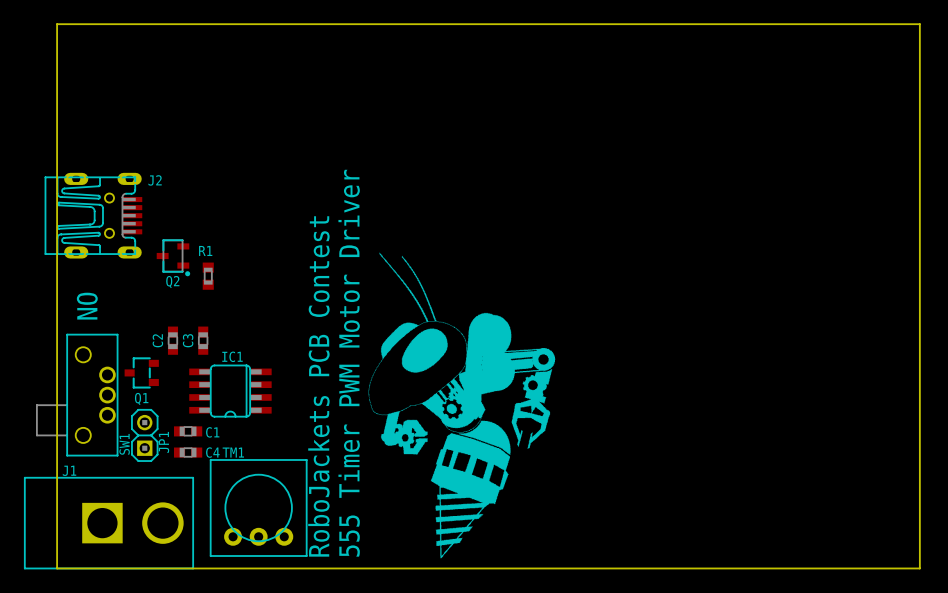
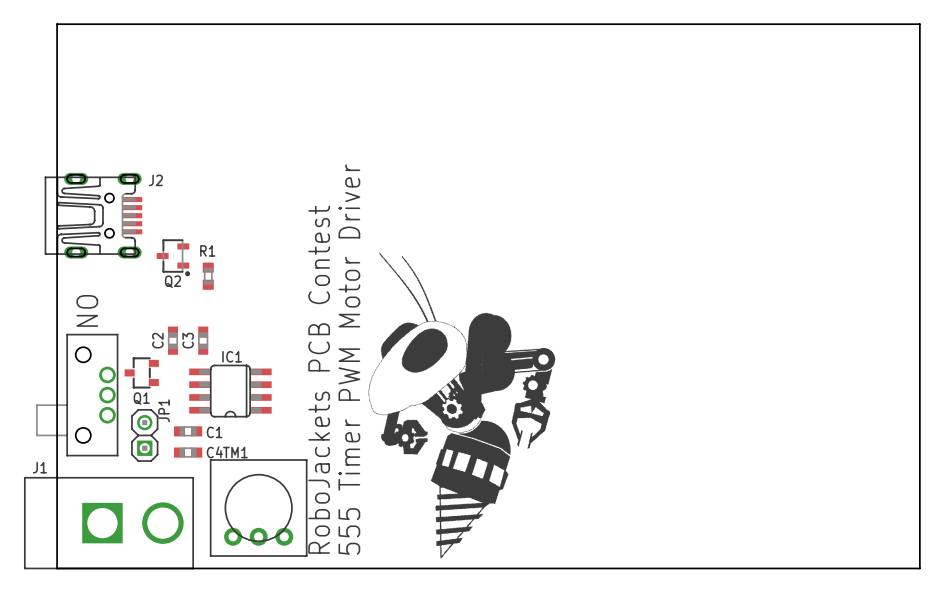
JP1 name position: JP1 (164, 442) -> JP1 (164, 410)
SW1 name: SW1 (124, 444) -> none
J1 name position: J1 (69, 470) -> J1 (39, 467)

